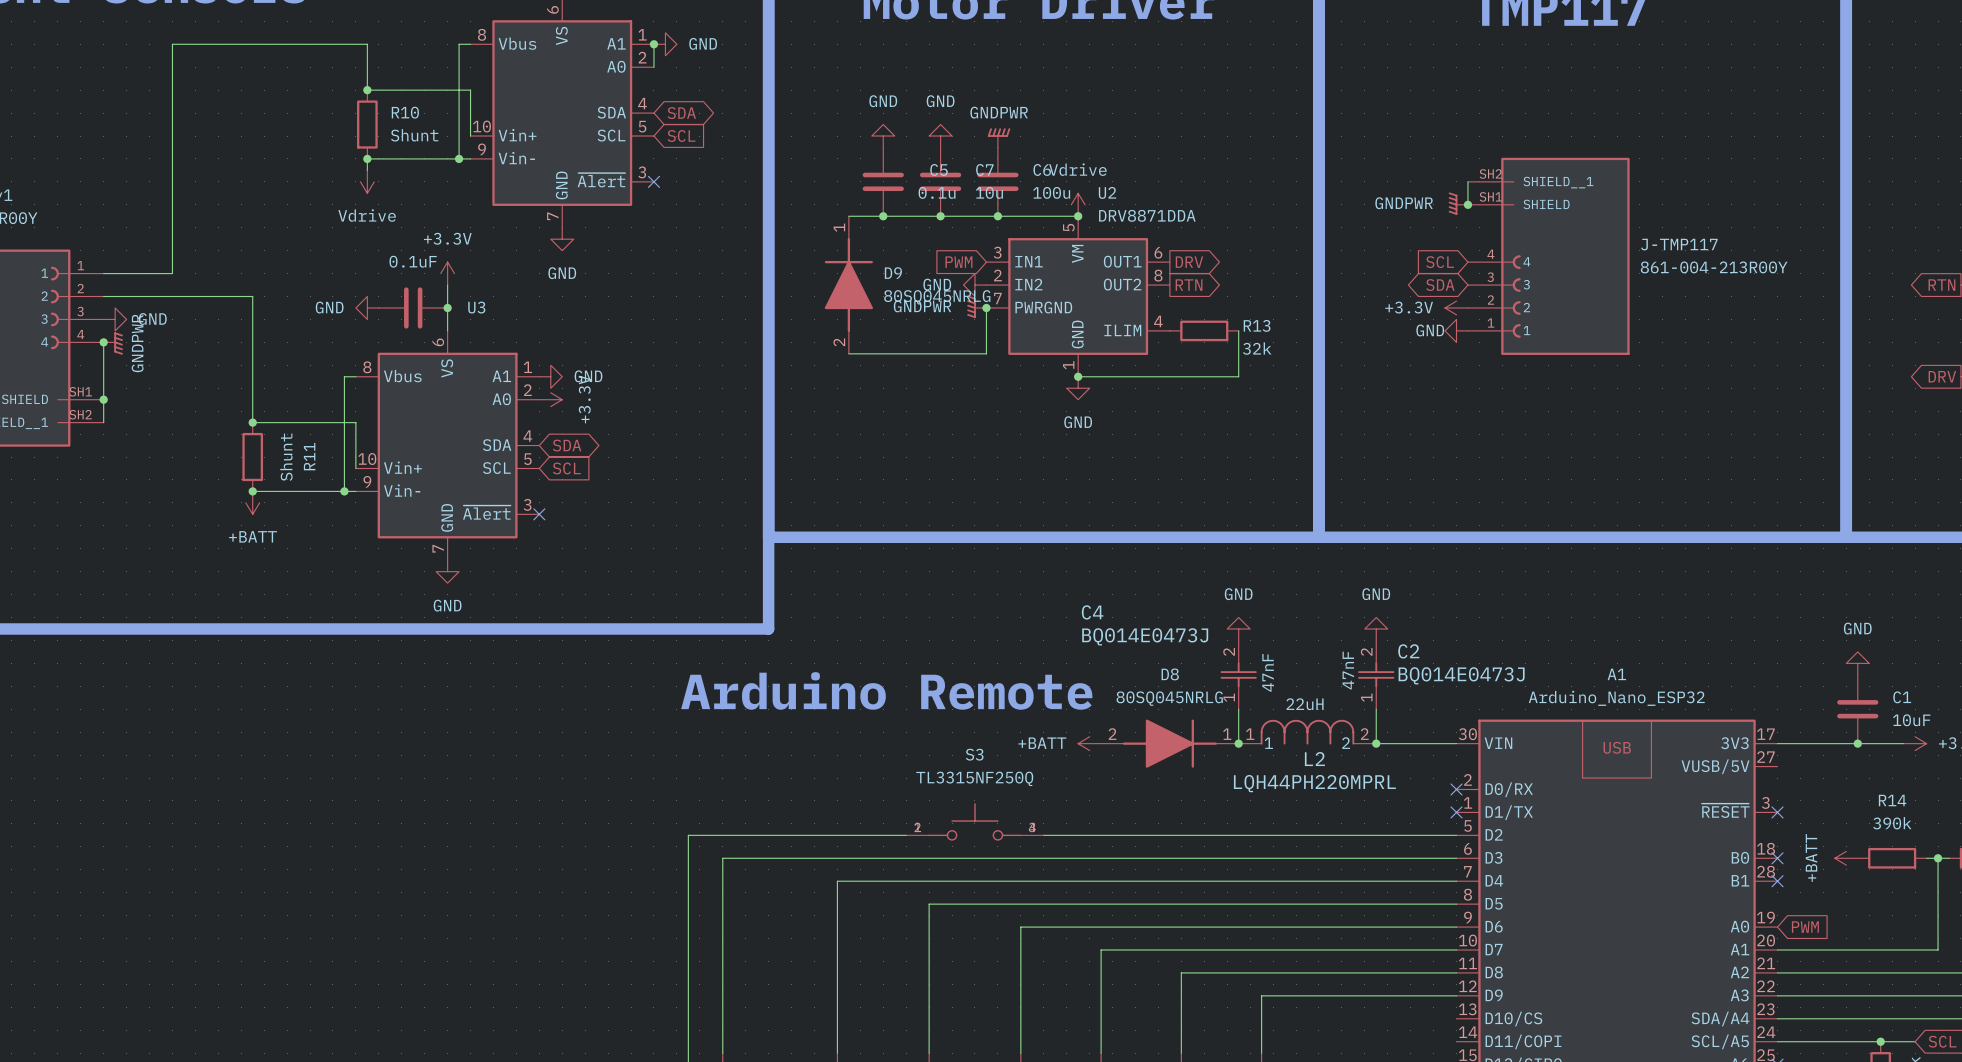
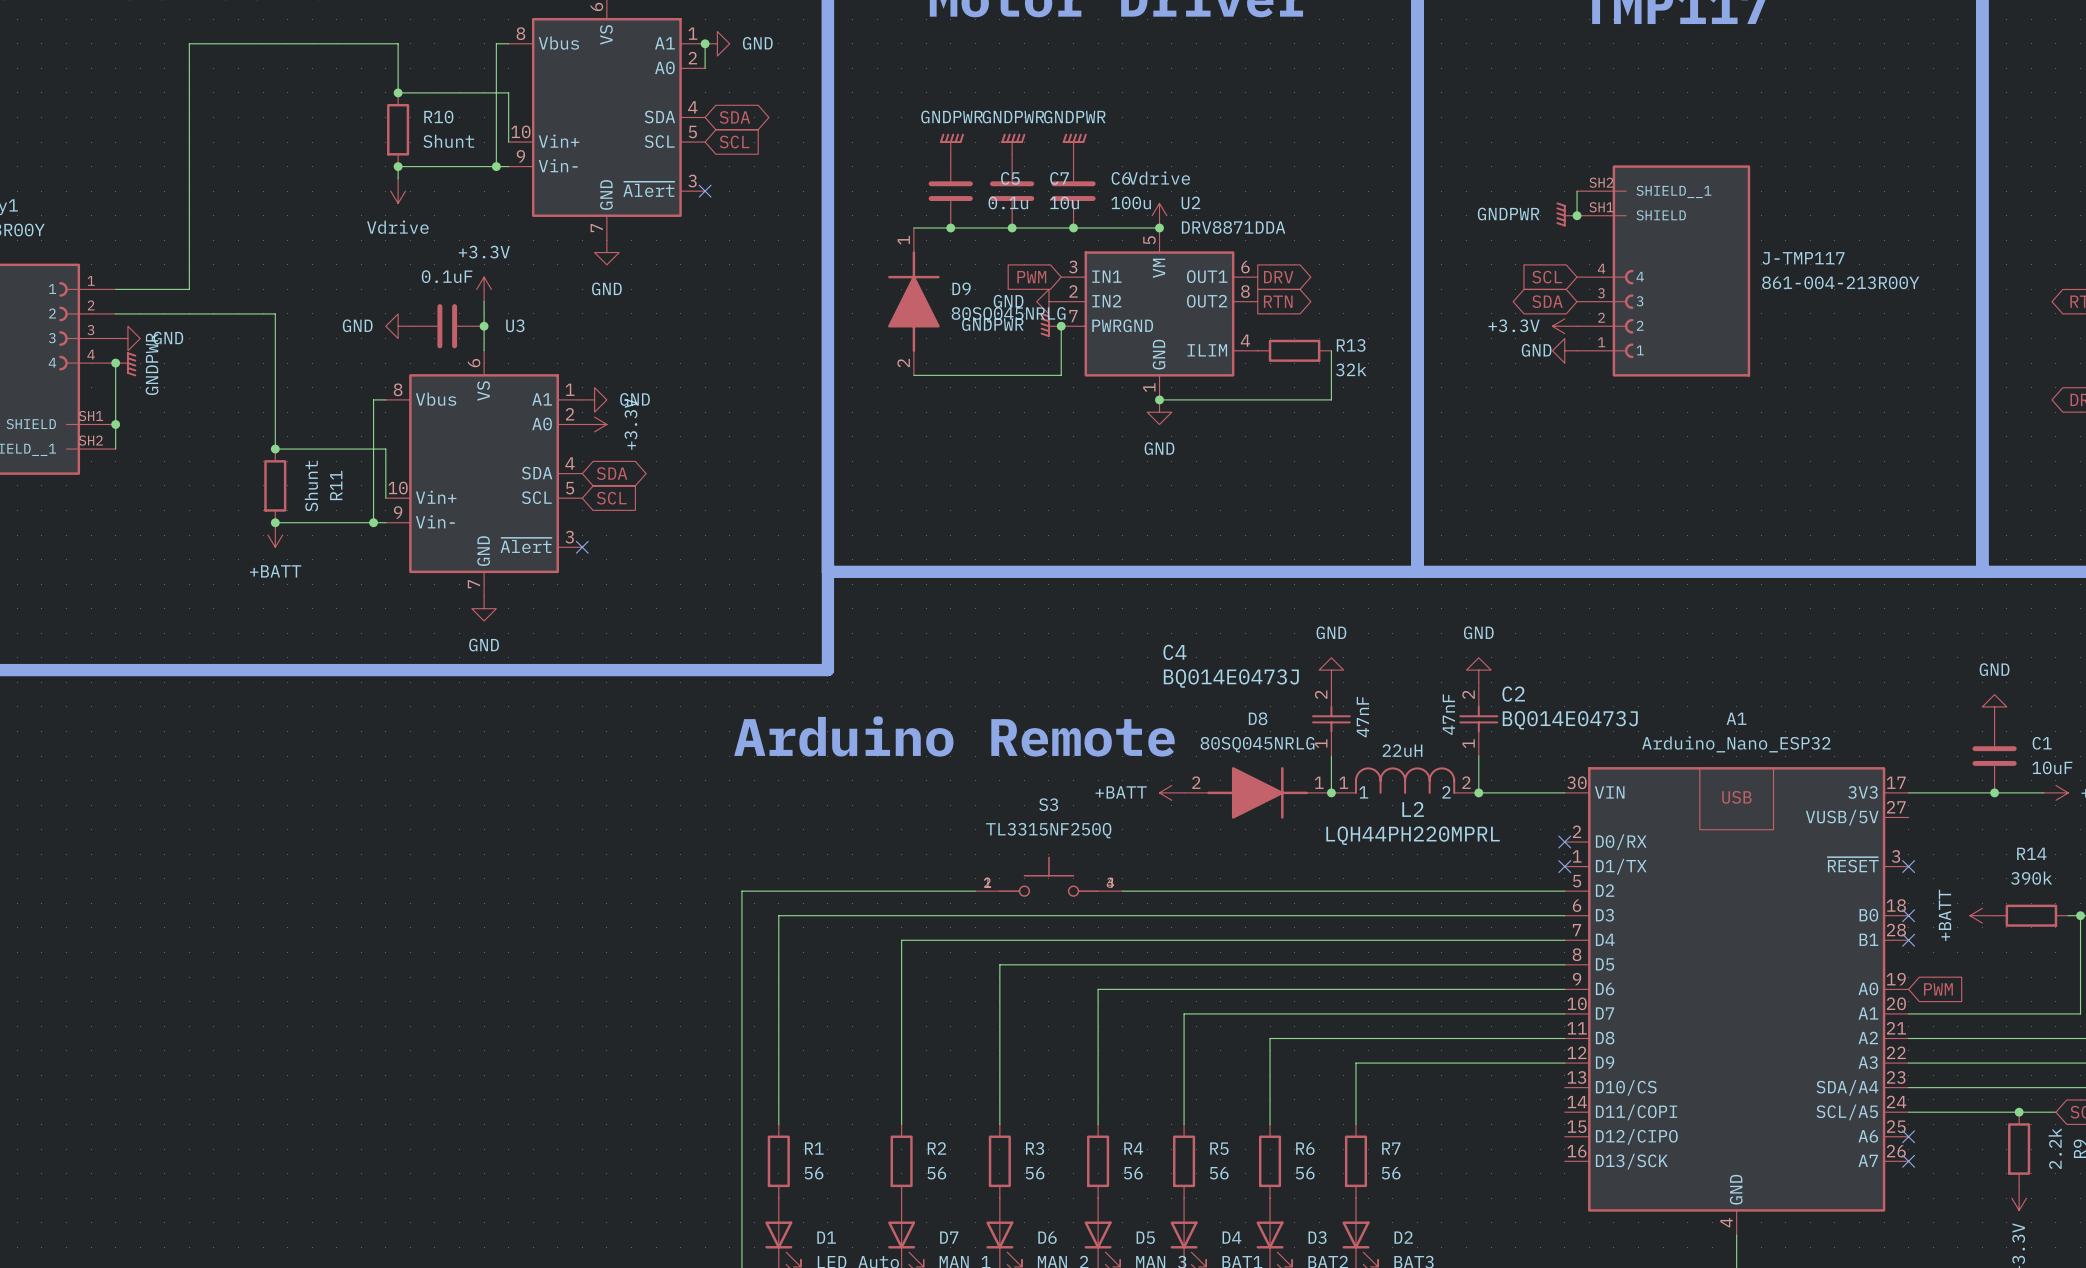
power symbol: GND (883, 136) -> GNDPWR (951, 144)
power symbol: GND (940, 136) -> GNDPWR (1013, 144)

